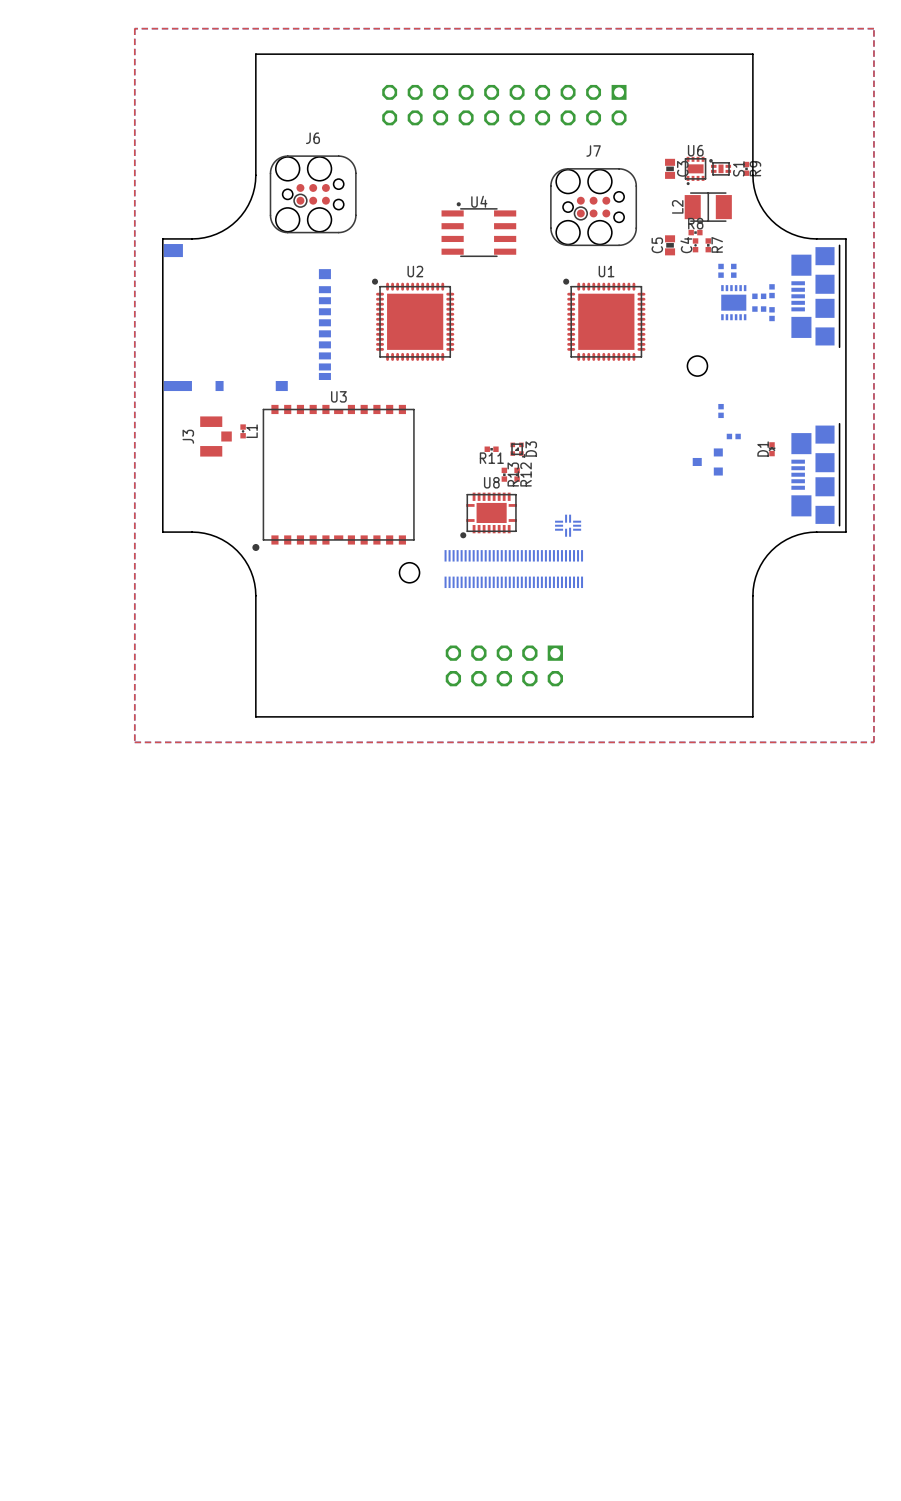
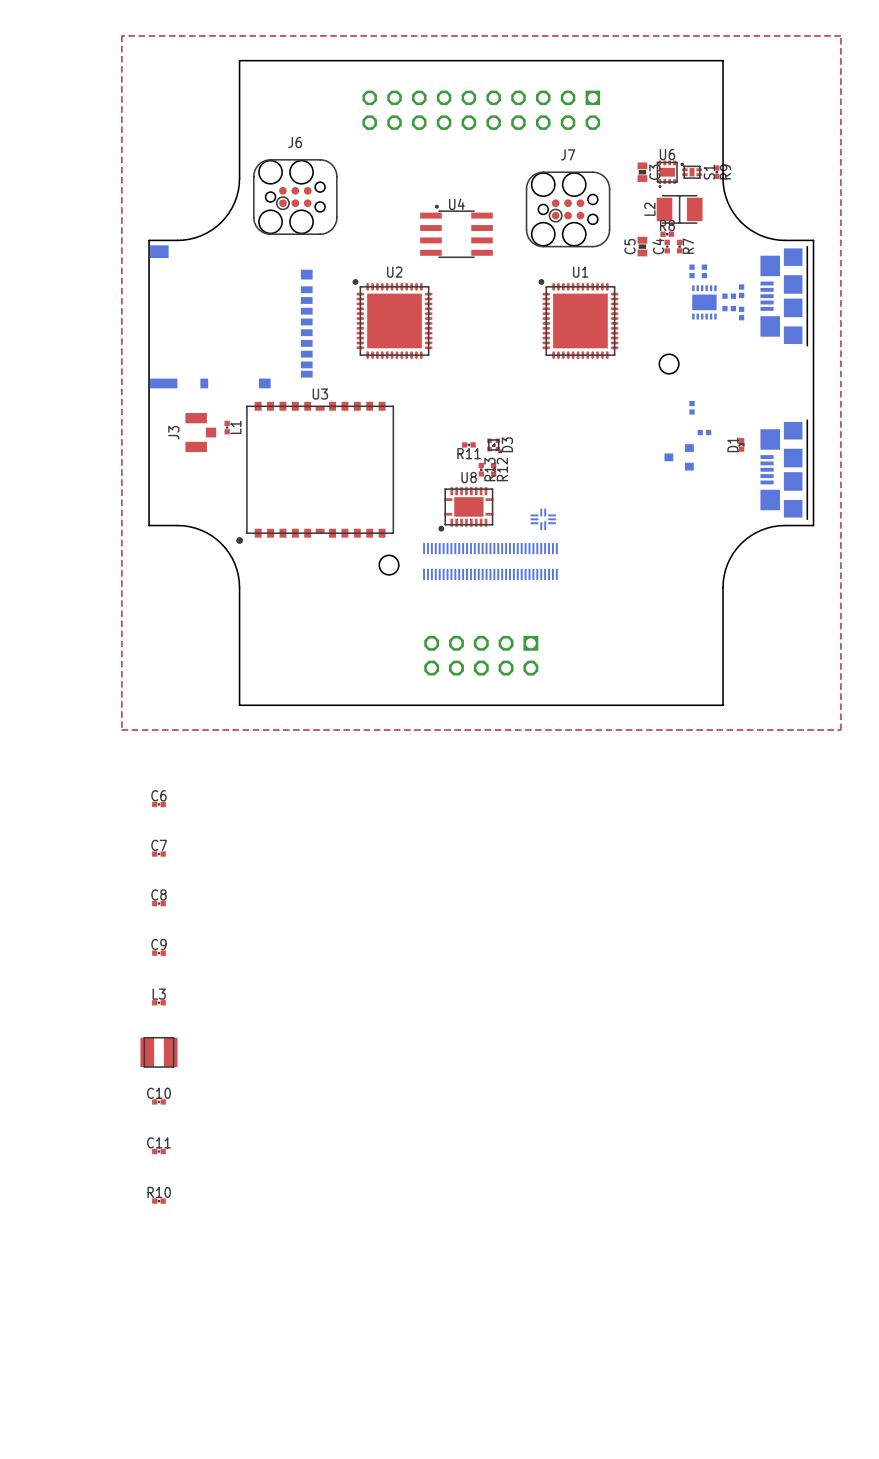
C6: none -> (158, 804)
C7: none -> (158, 854)
C8: none -> (158, 903)
C9: none -> (158, 953)
L3: none -> (158, 1002)
part: none -> (158, 1052)
C10: none -> (158, 1101)
C11: none -> (158, 1151)
R10: none -> (158, 1201)

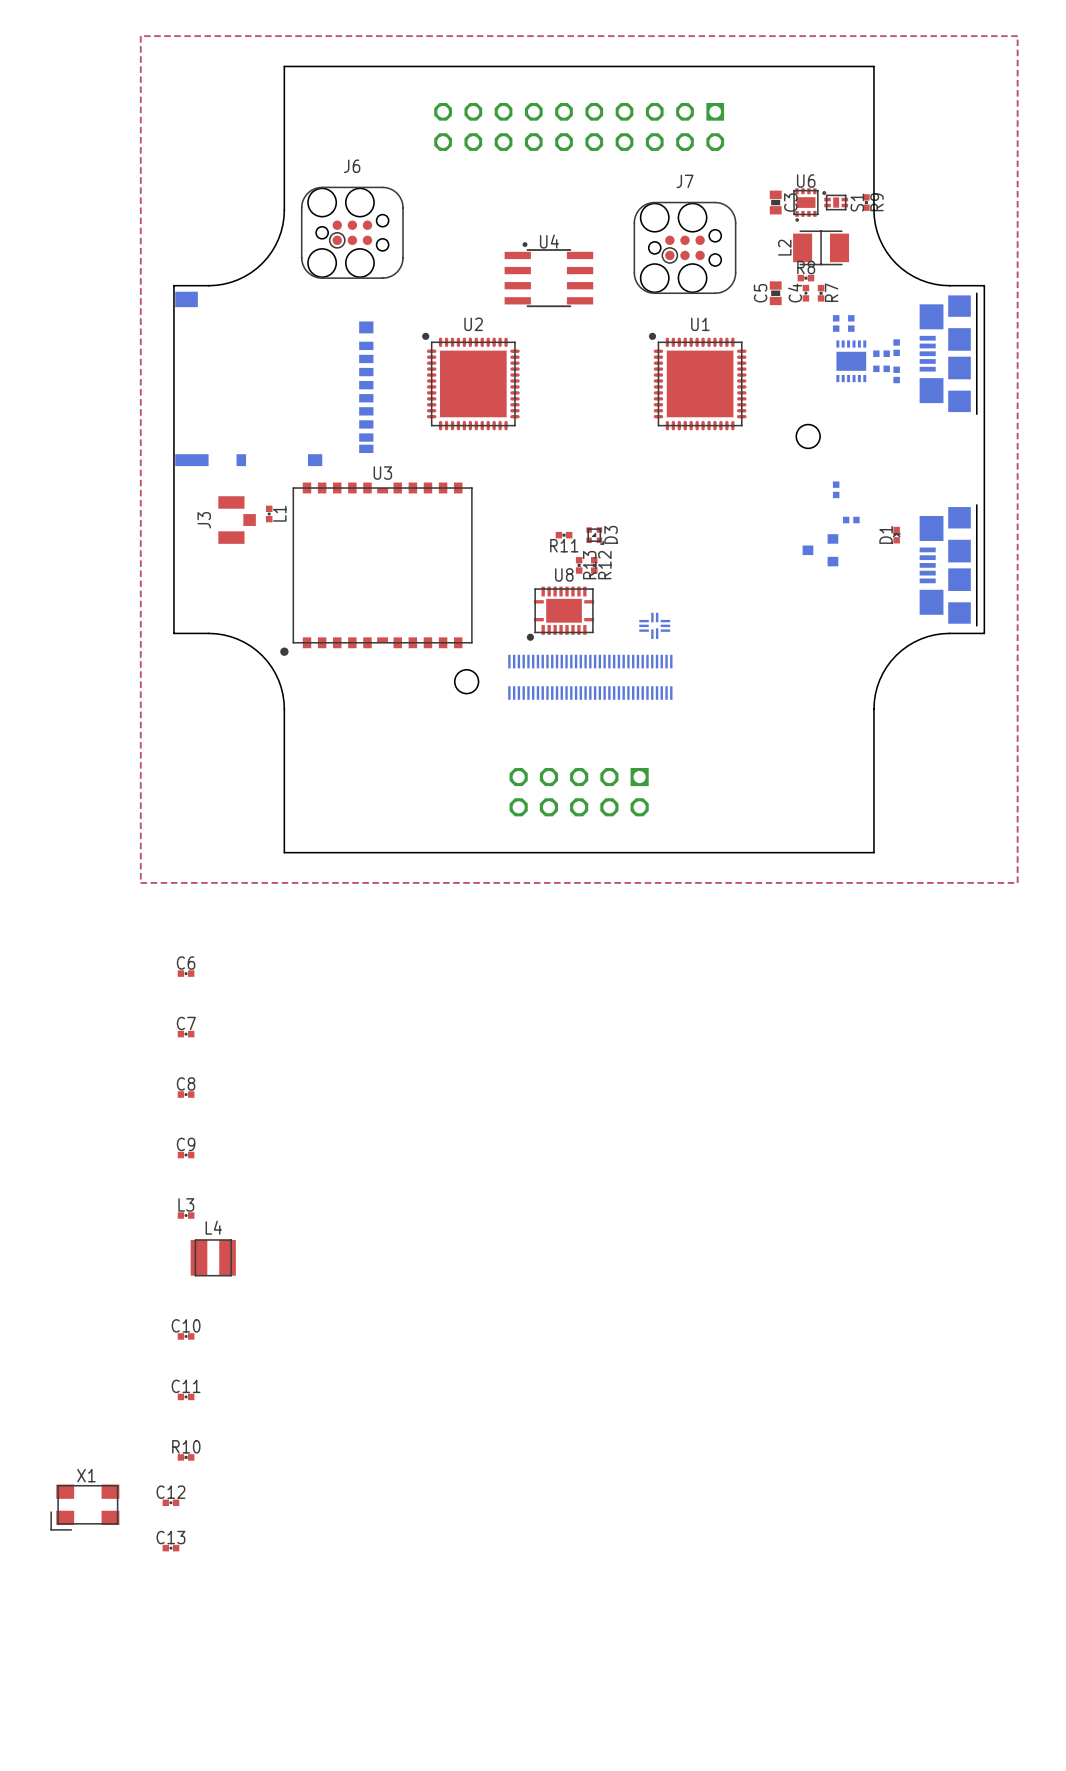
L4: none -> (213, 1257)
part: (158, 1052) -> none
C12: none -> (170, 1502)
X1: none -> (84, 1507)
C13: none -> (170, 1548)

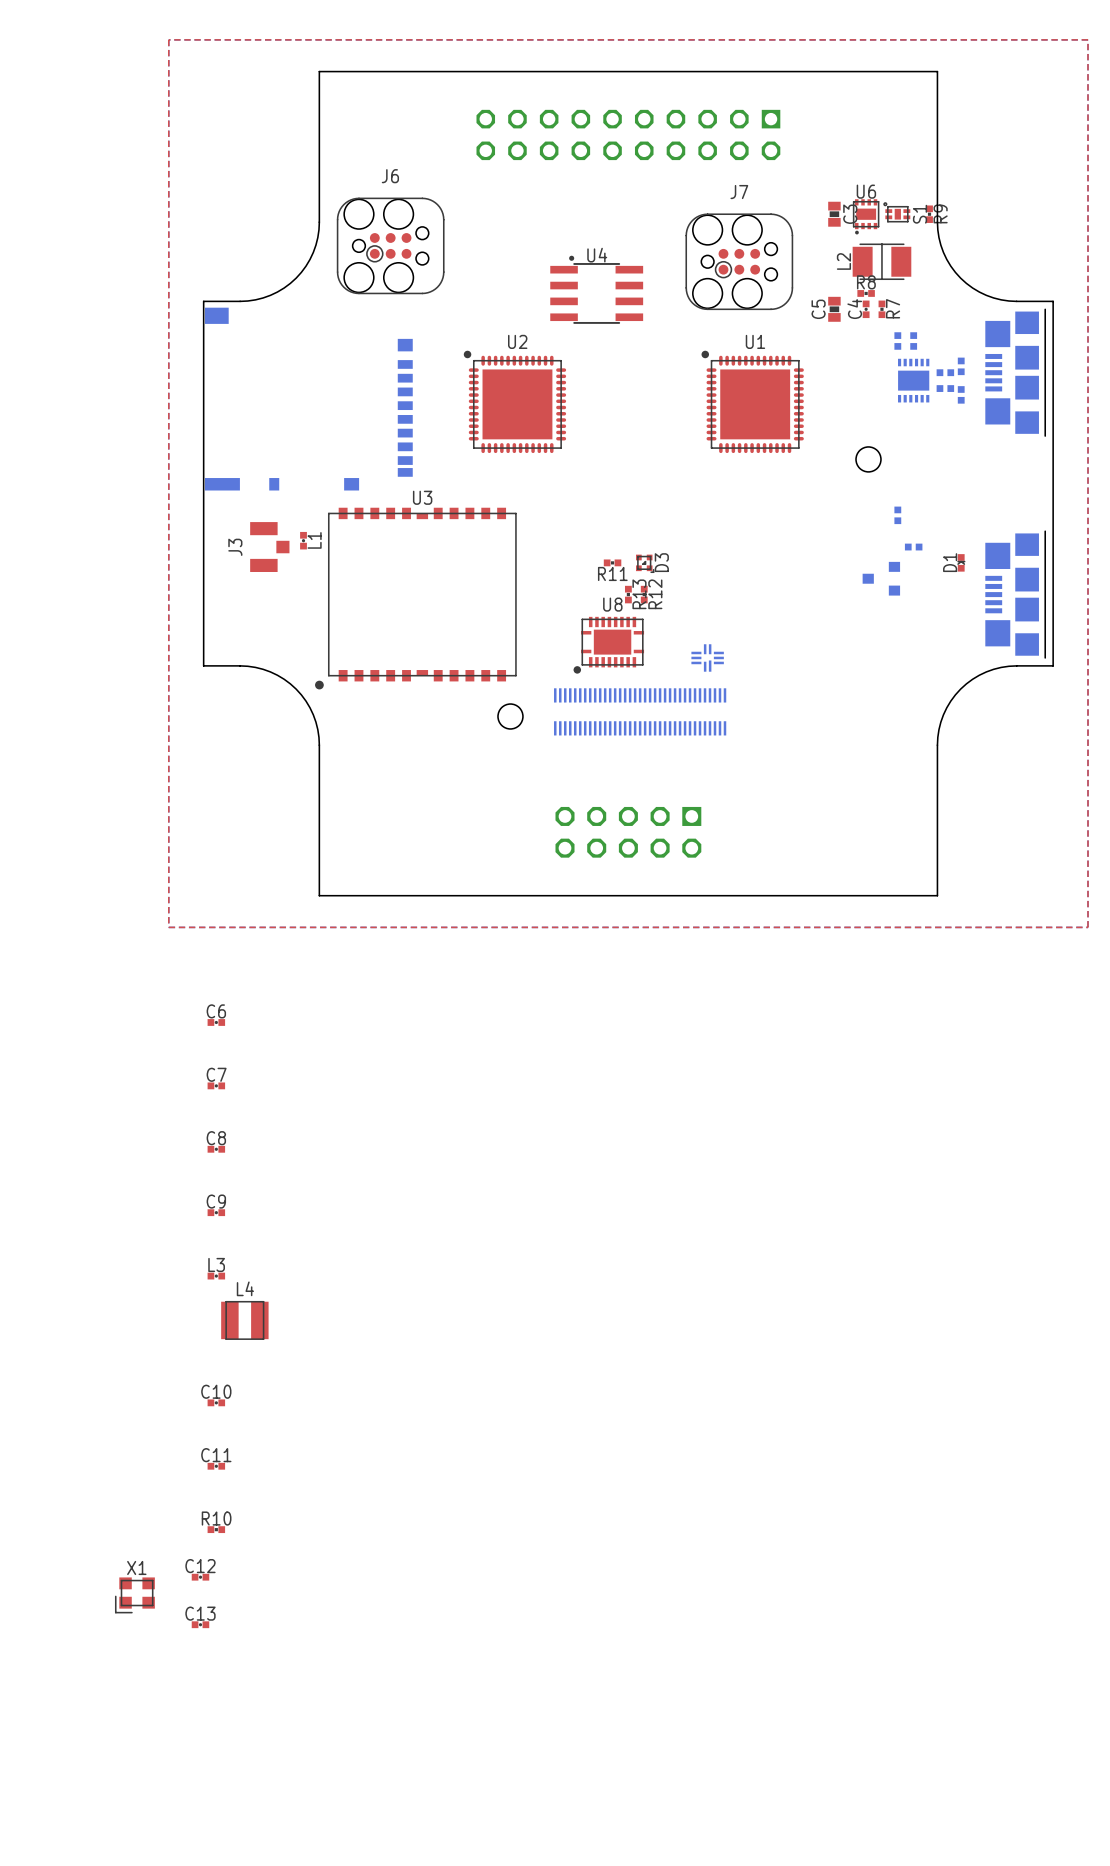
X1 footprint: [50, 1484, 120, 1531] -> [114, 1577, 155, 1614]

